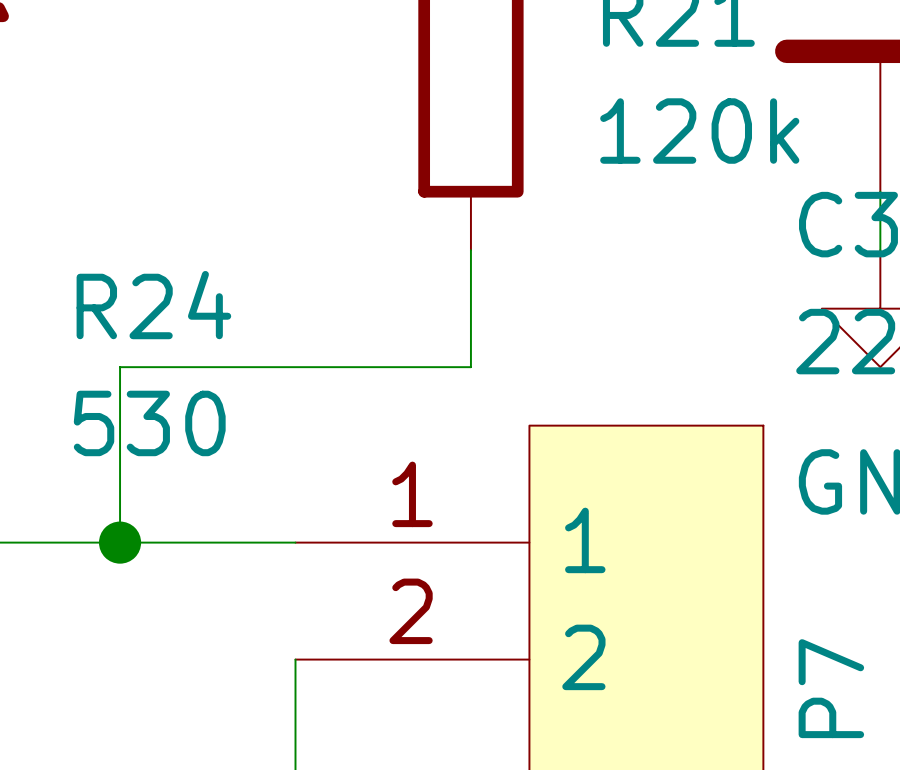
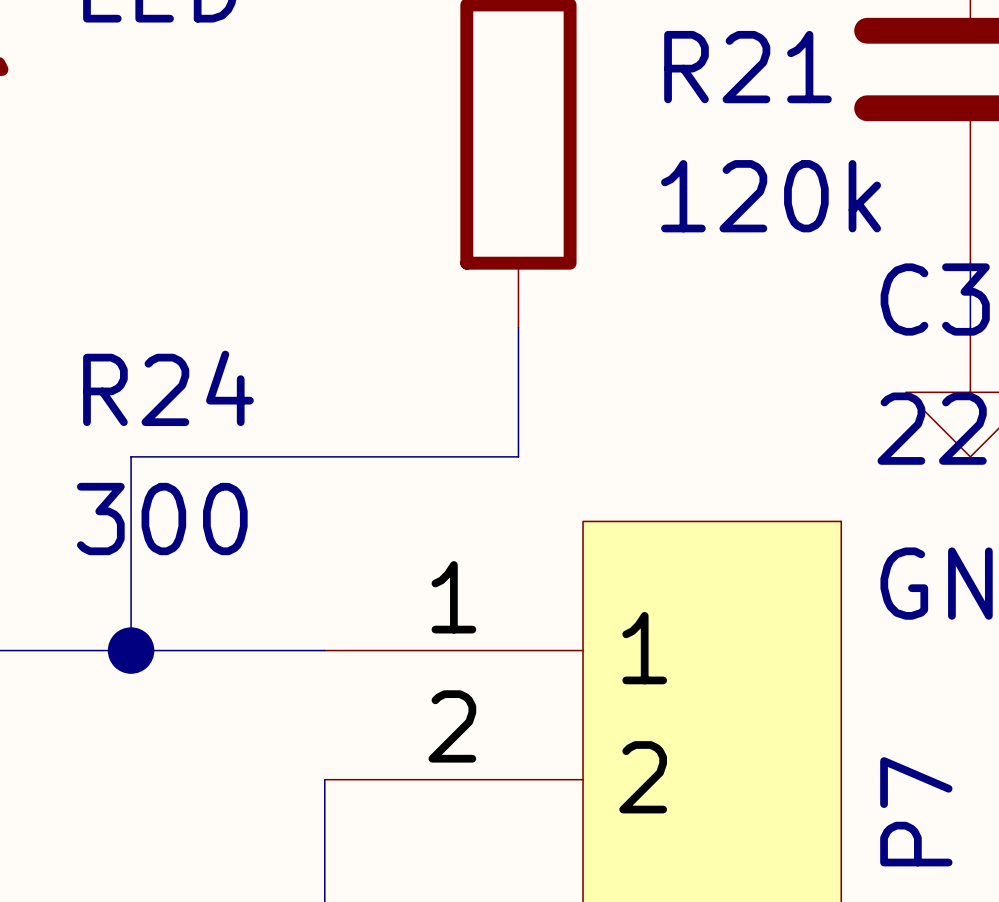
R24 value: 530 (149, 423) -> 300 (162, 519)

